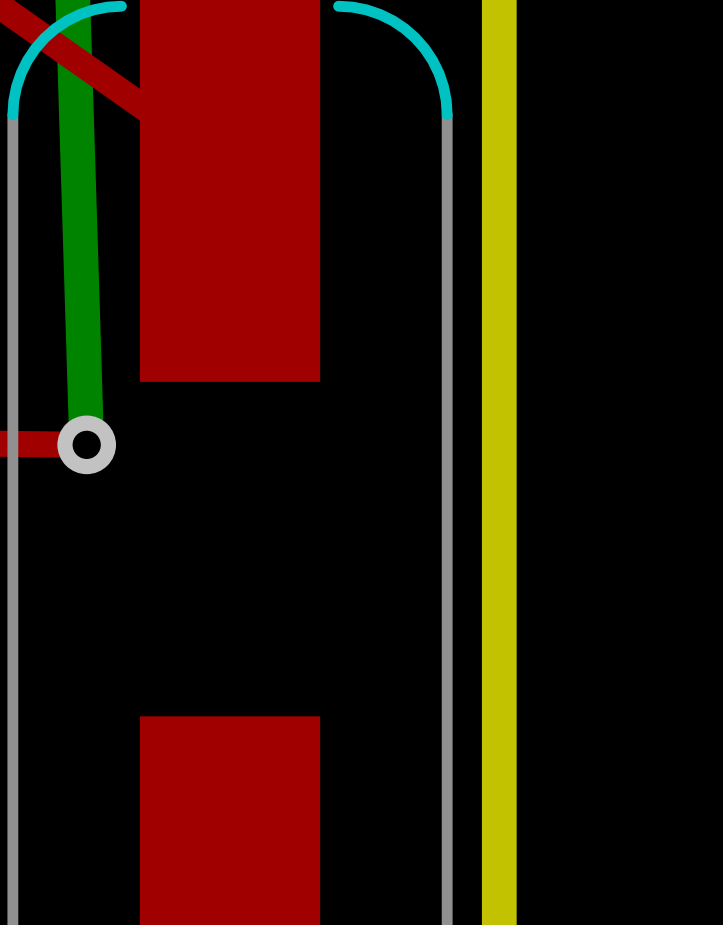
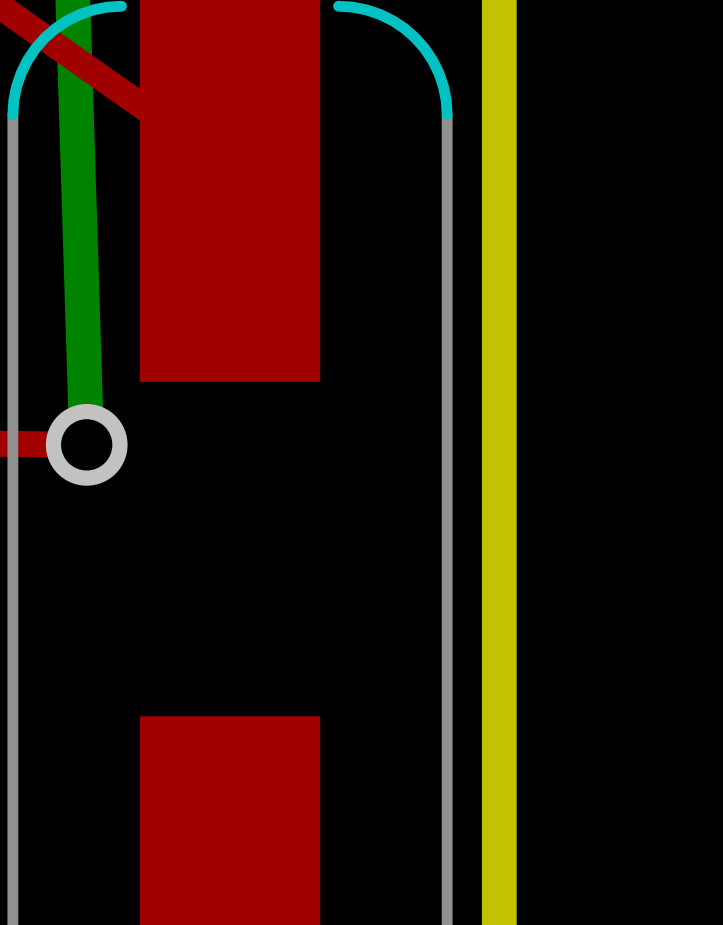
via size: [57, 415, 117, 475] -> [45, 404, 128, 486]

